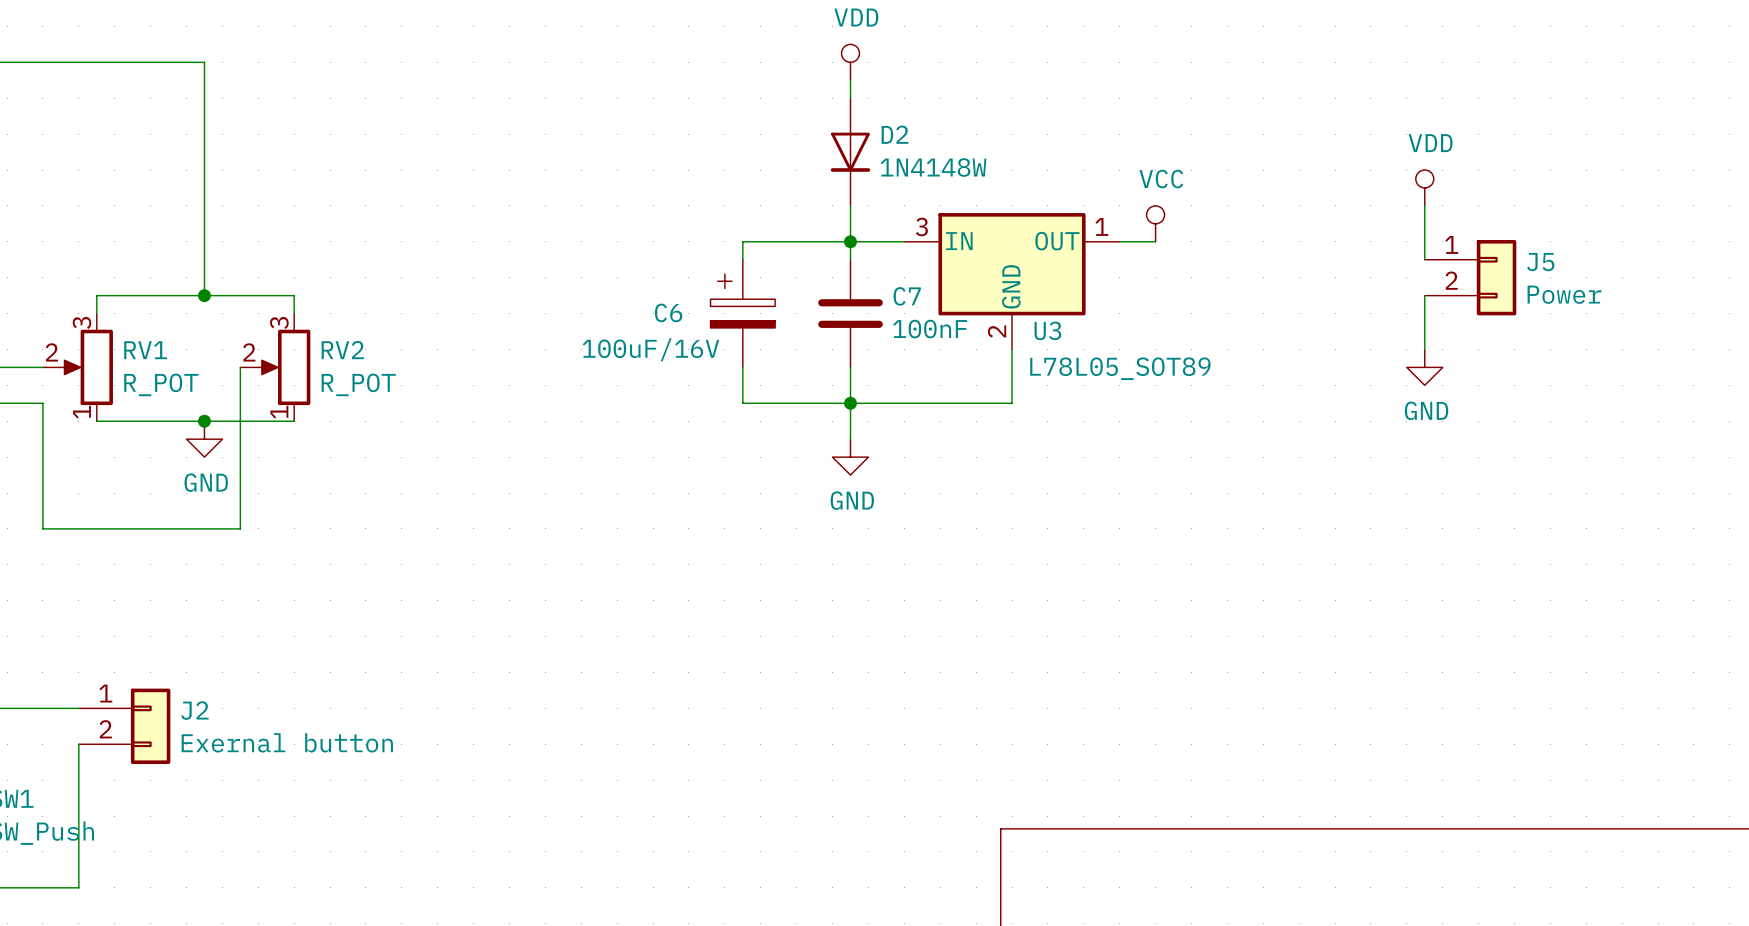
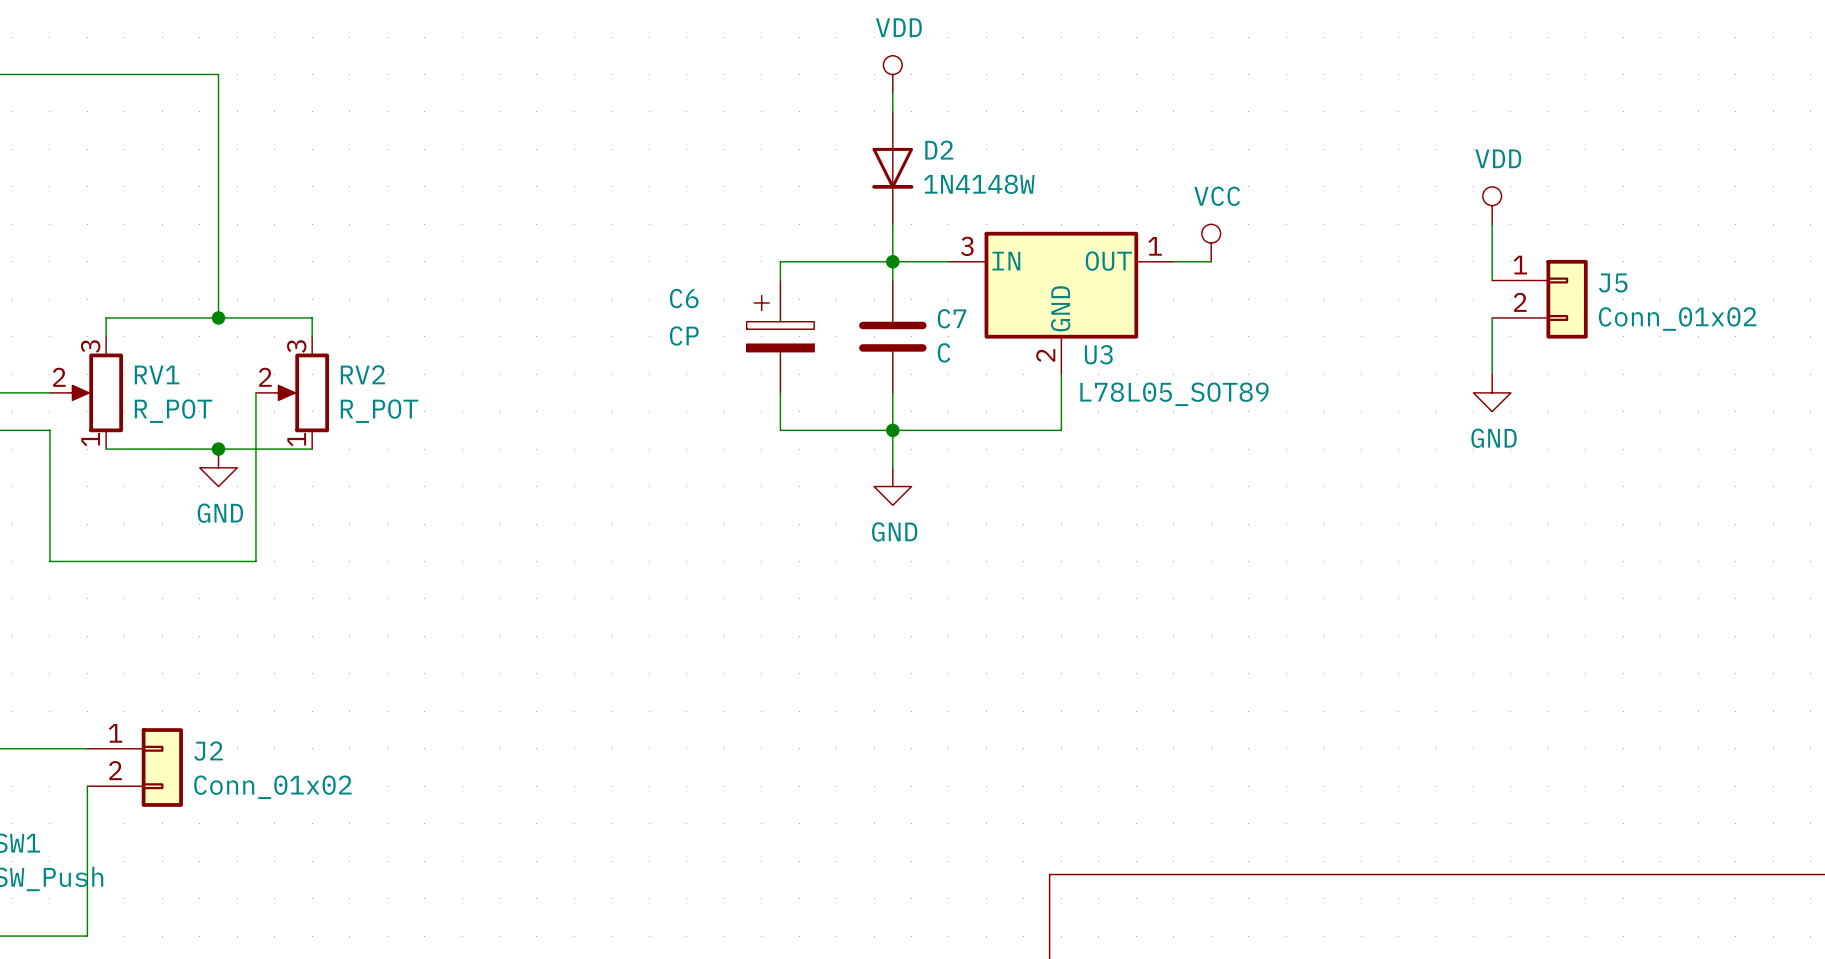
J5 value: Power (1564, 294) -> Conn_01x02 (1677, 319)
C6 name position: C6 (668, 312) -> C6 (684, 298)
C7 value: 100nF (930, 329) -> C (944, 352)
C6 value: 100uF/16V (650, 349) -> CP (684, 336)
J2 value: Exernal button (287, 742) -> Conn_01x02 (272, 787)

